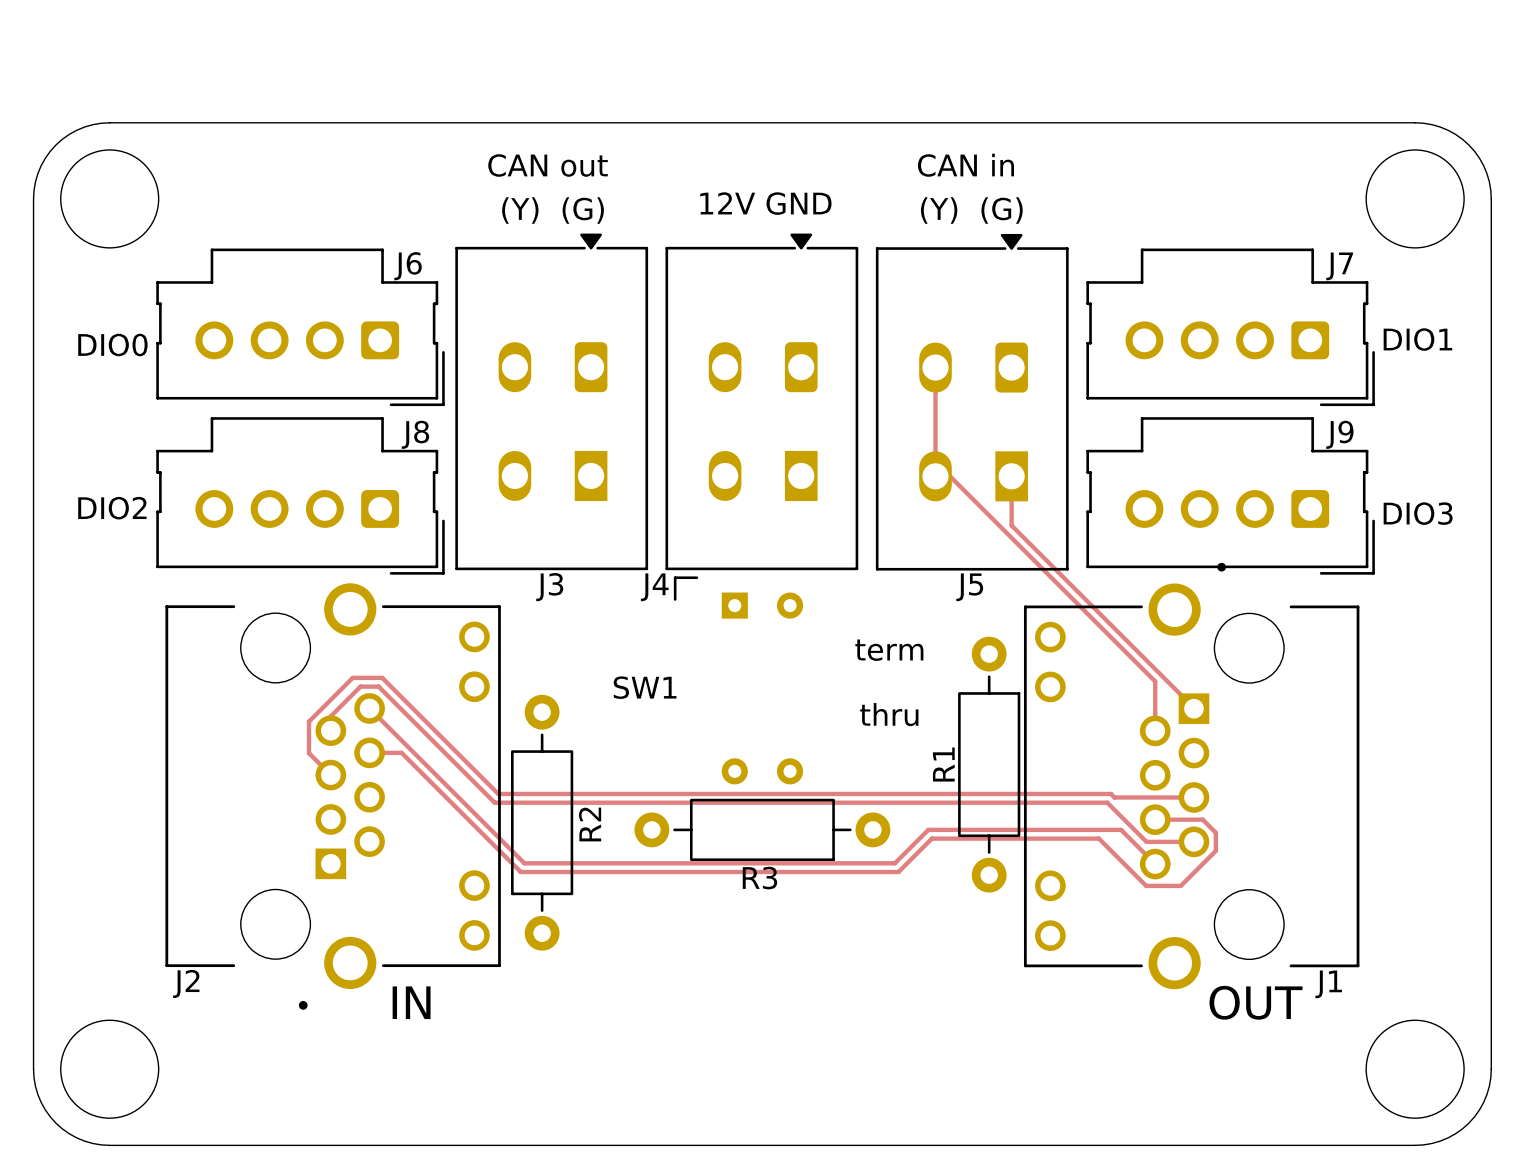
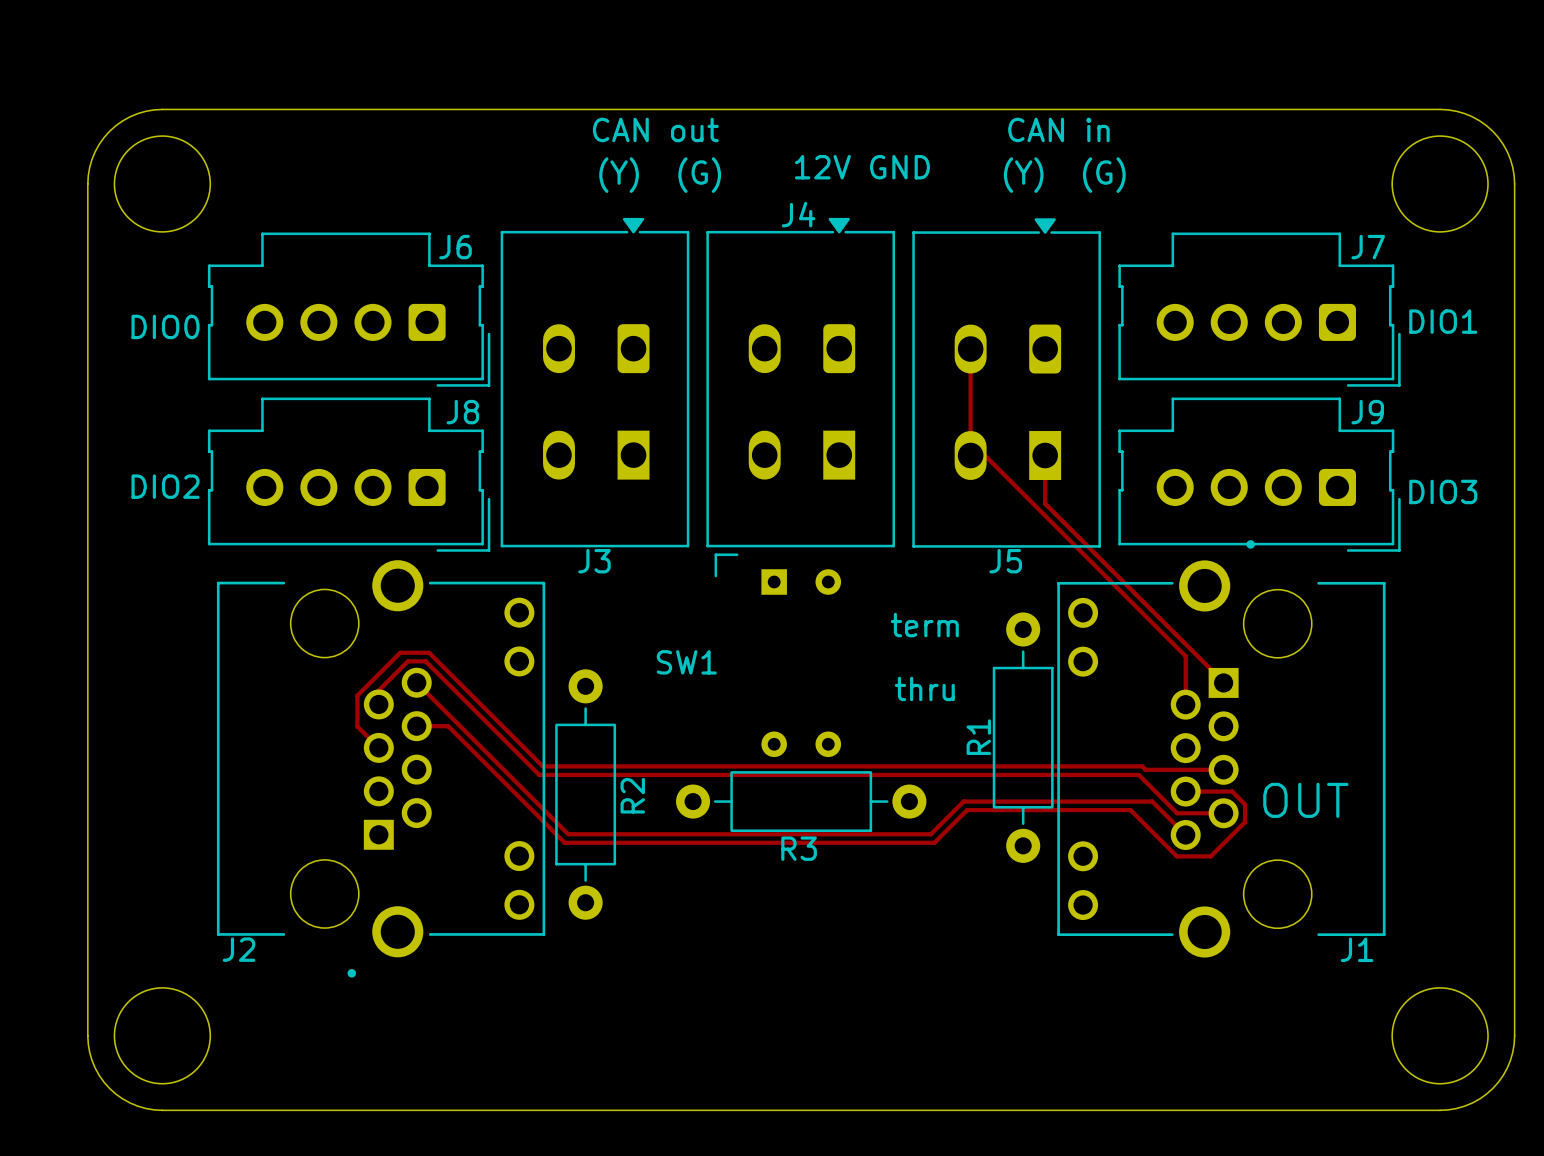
text position: CAN out (548, 165) -> CAN out (655, 129)
text position: CAN in (965, 165) -> CAN in (1058, 129)
text position: 12V GND (765, 203) -> 12V GND (862, 167)
text position: (Y) (G) (553, 210) -> (Y) (G) (660, 175)
text position: (Y) (G) (971, 210) -> (Y) (G) (1064, 175)
J4 name position: J4 (654, 587) -> J4 (798, 214)
text: IN (411, 1002) -> none
text position: OUT (1256, 1002) -> OUT (1305, 800)

